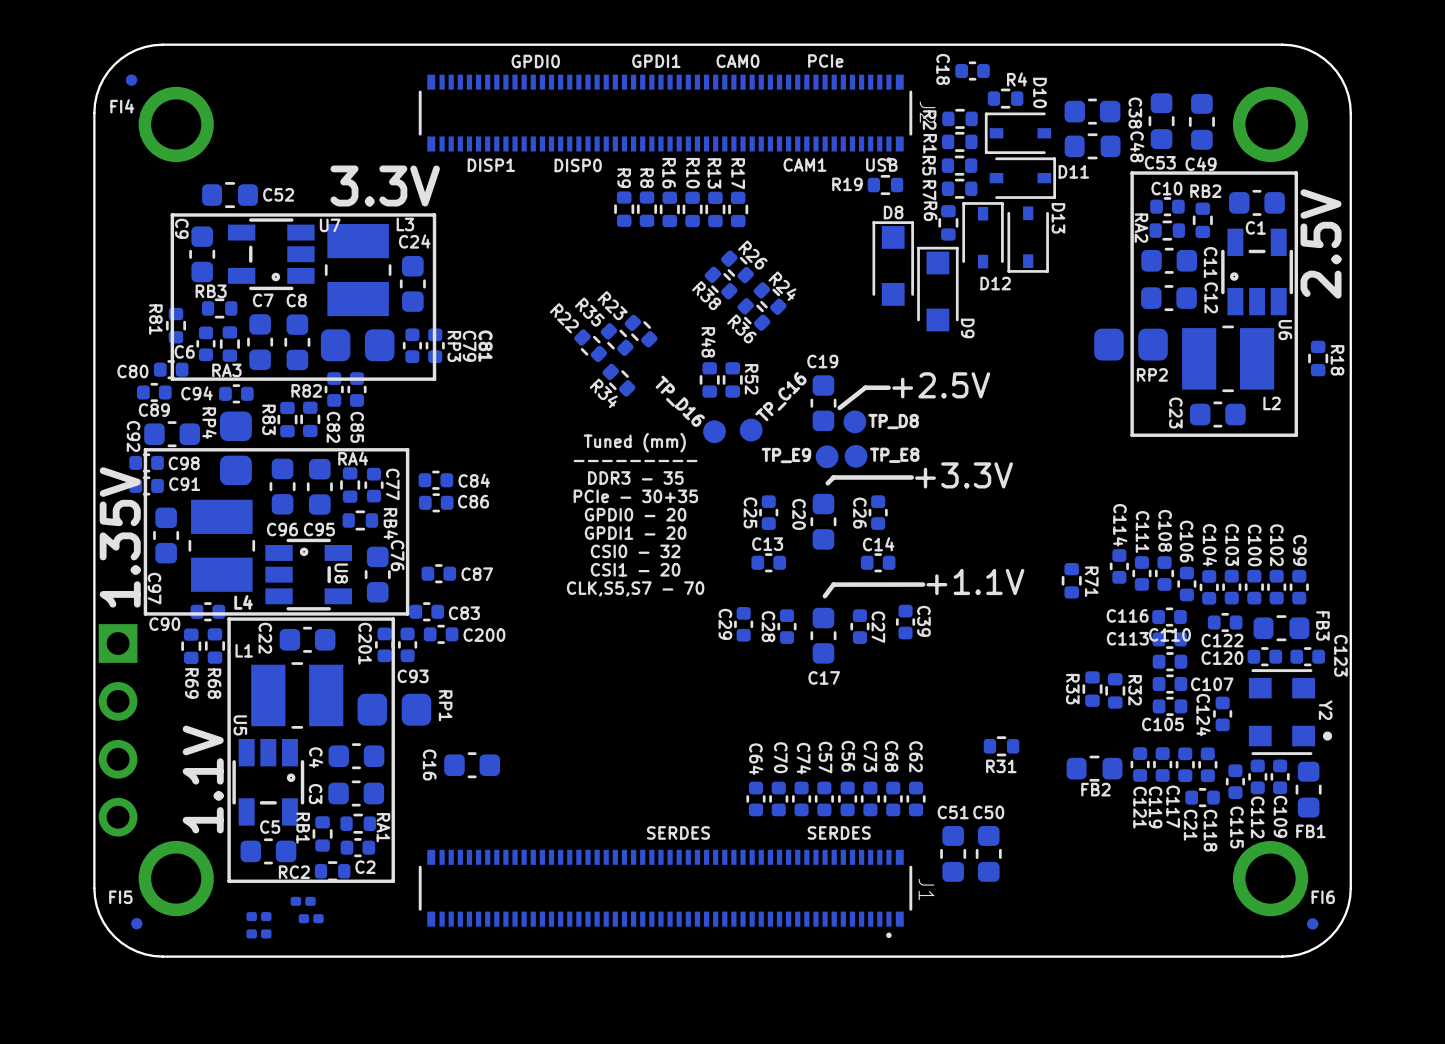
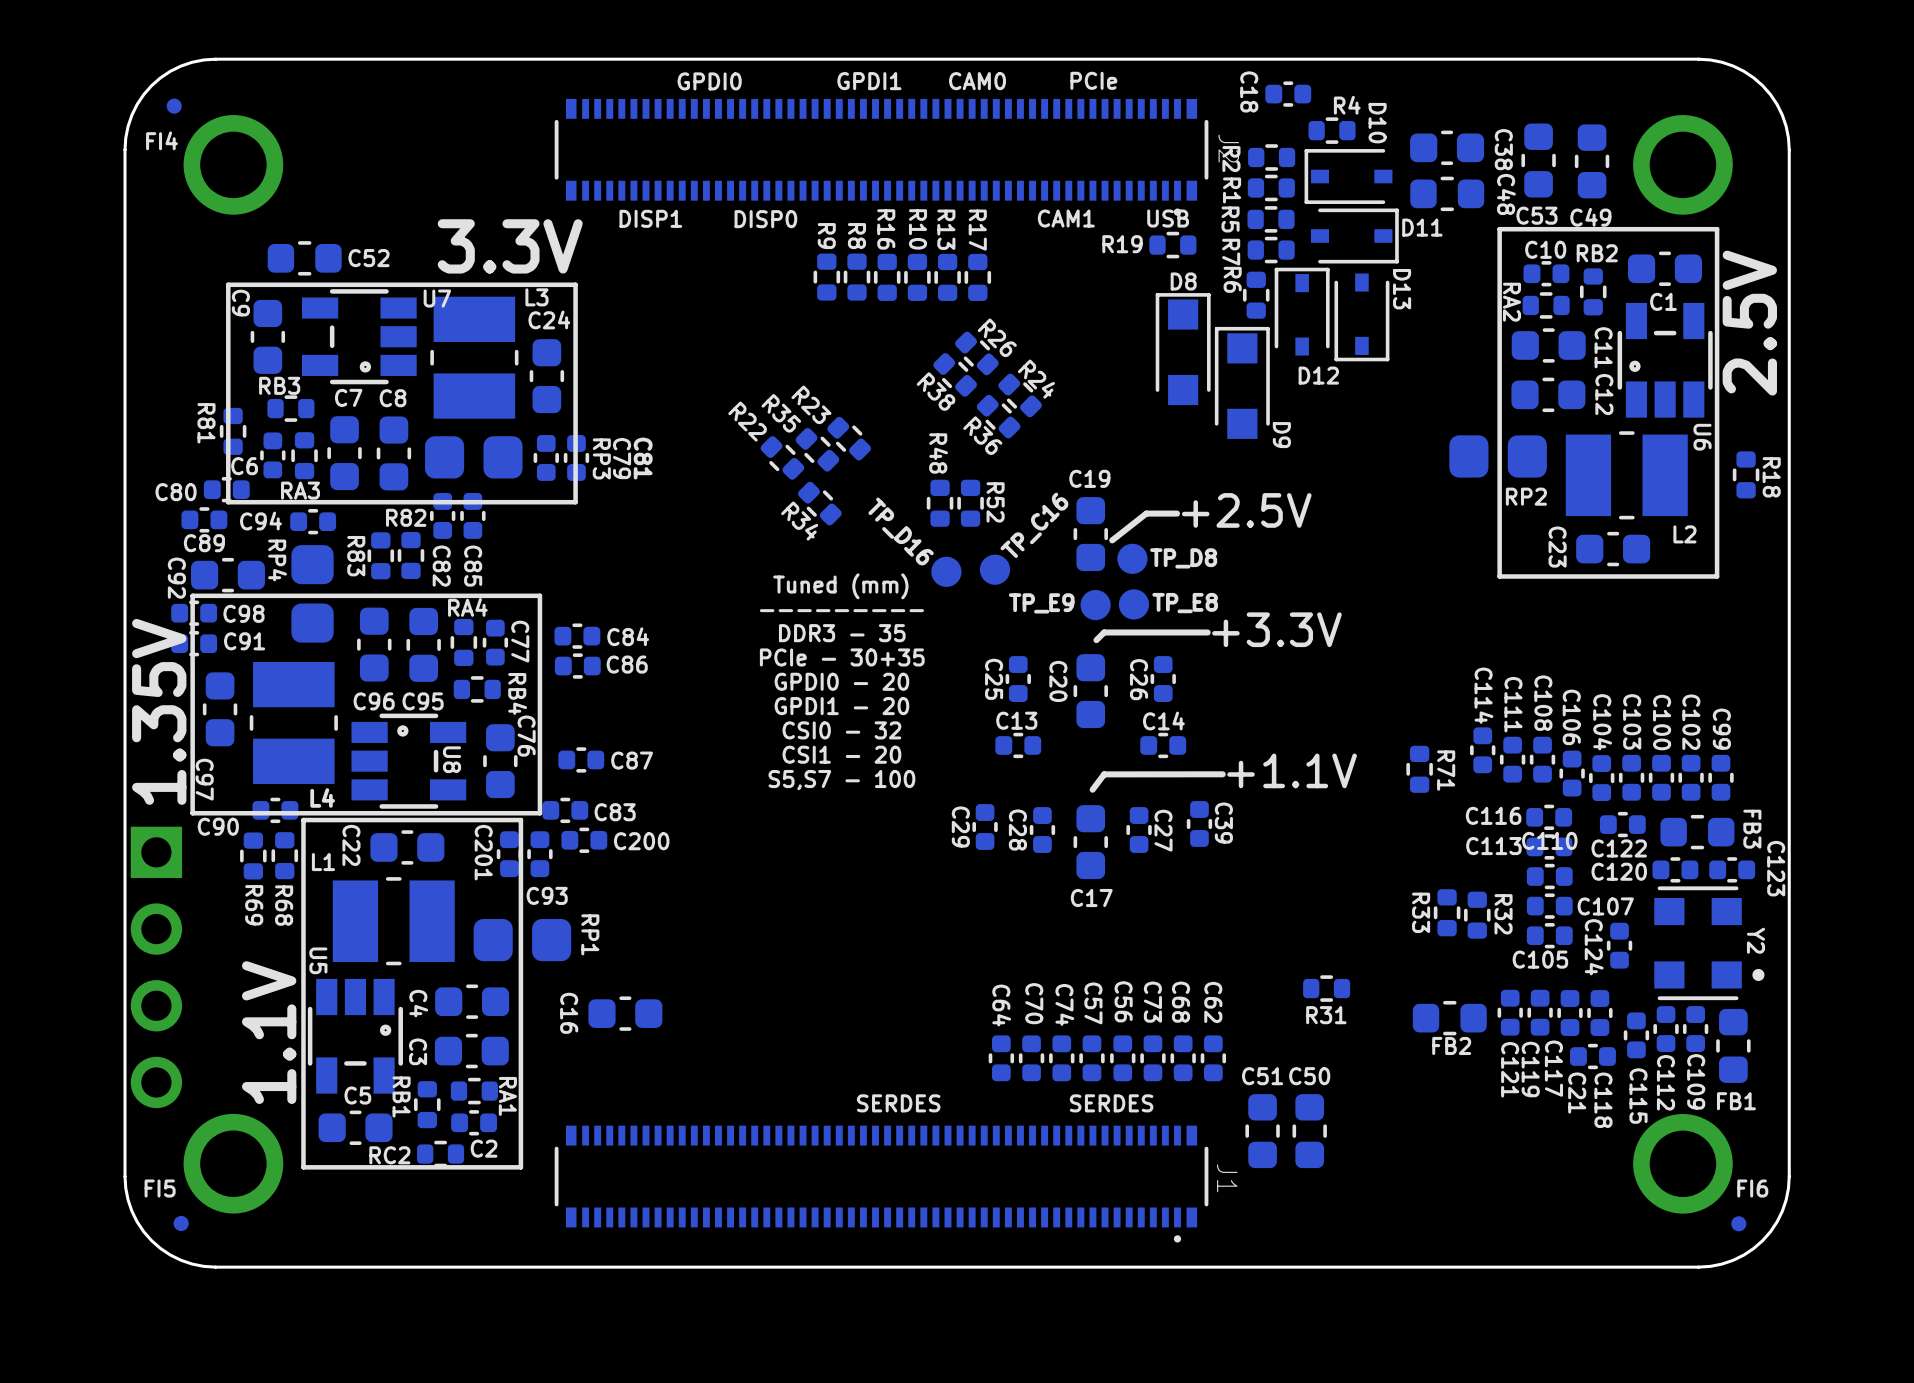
text: CLK,S5,S7 - 70 (635, 588) -> S5,S7 - 100 (841, 780)
part: (303, 901) -> none
part: (258, 916) -> none
part: (311, 918) -> none
part: (258, 933) -> none

